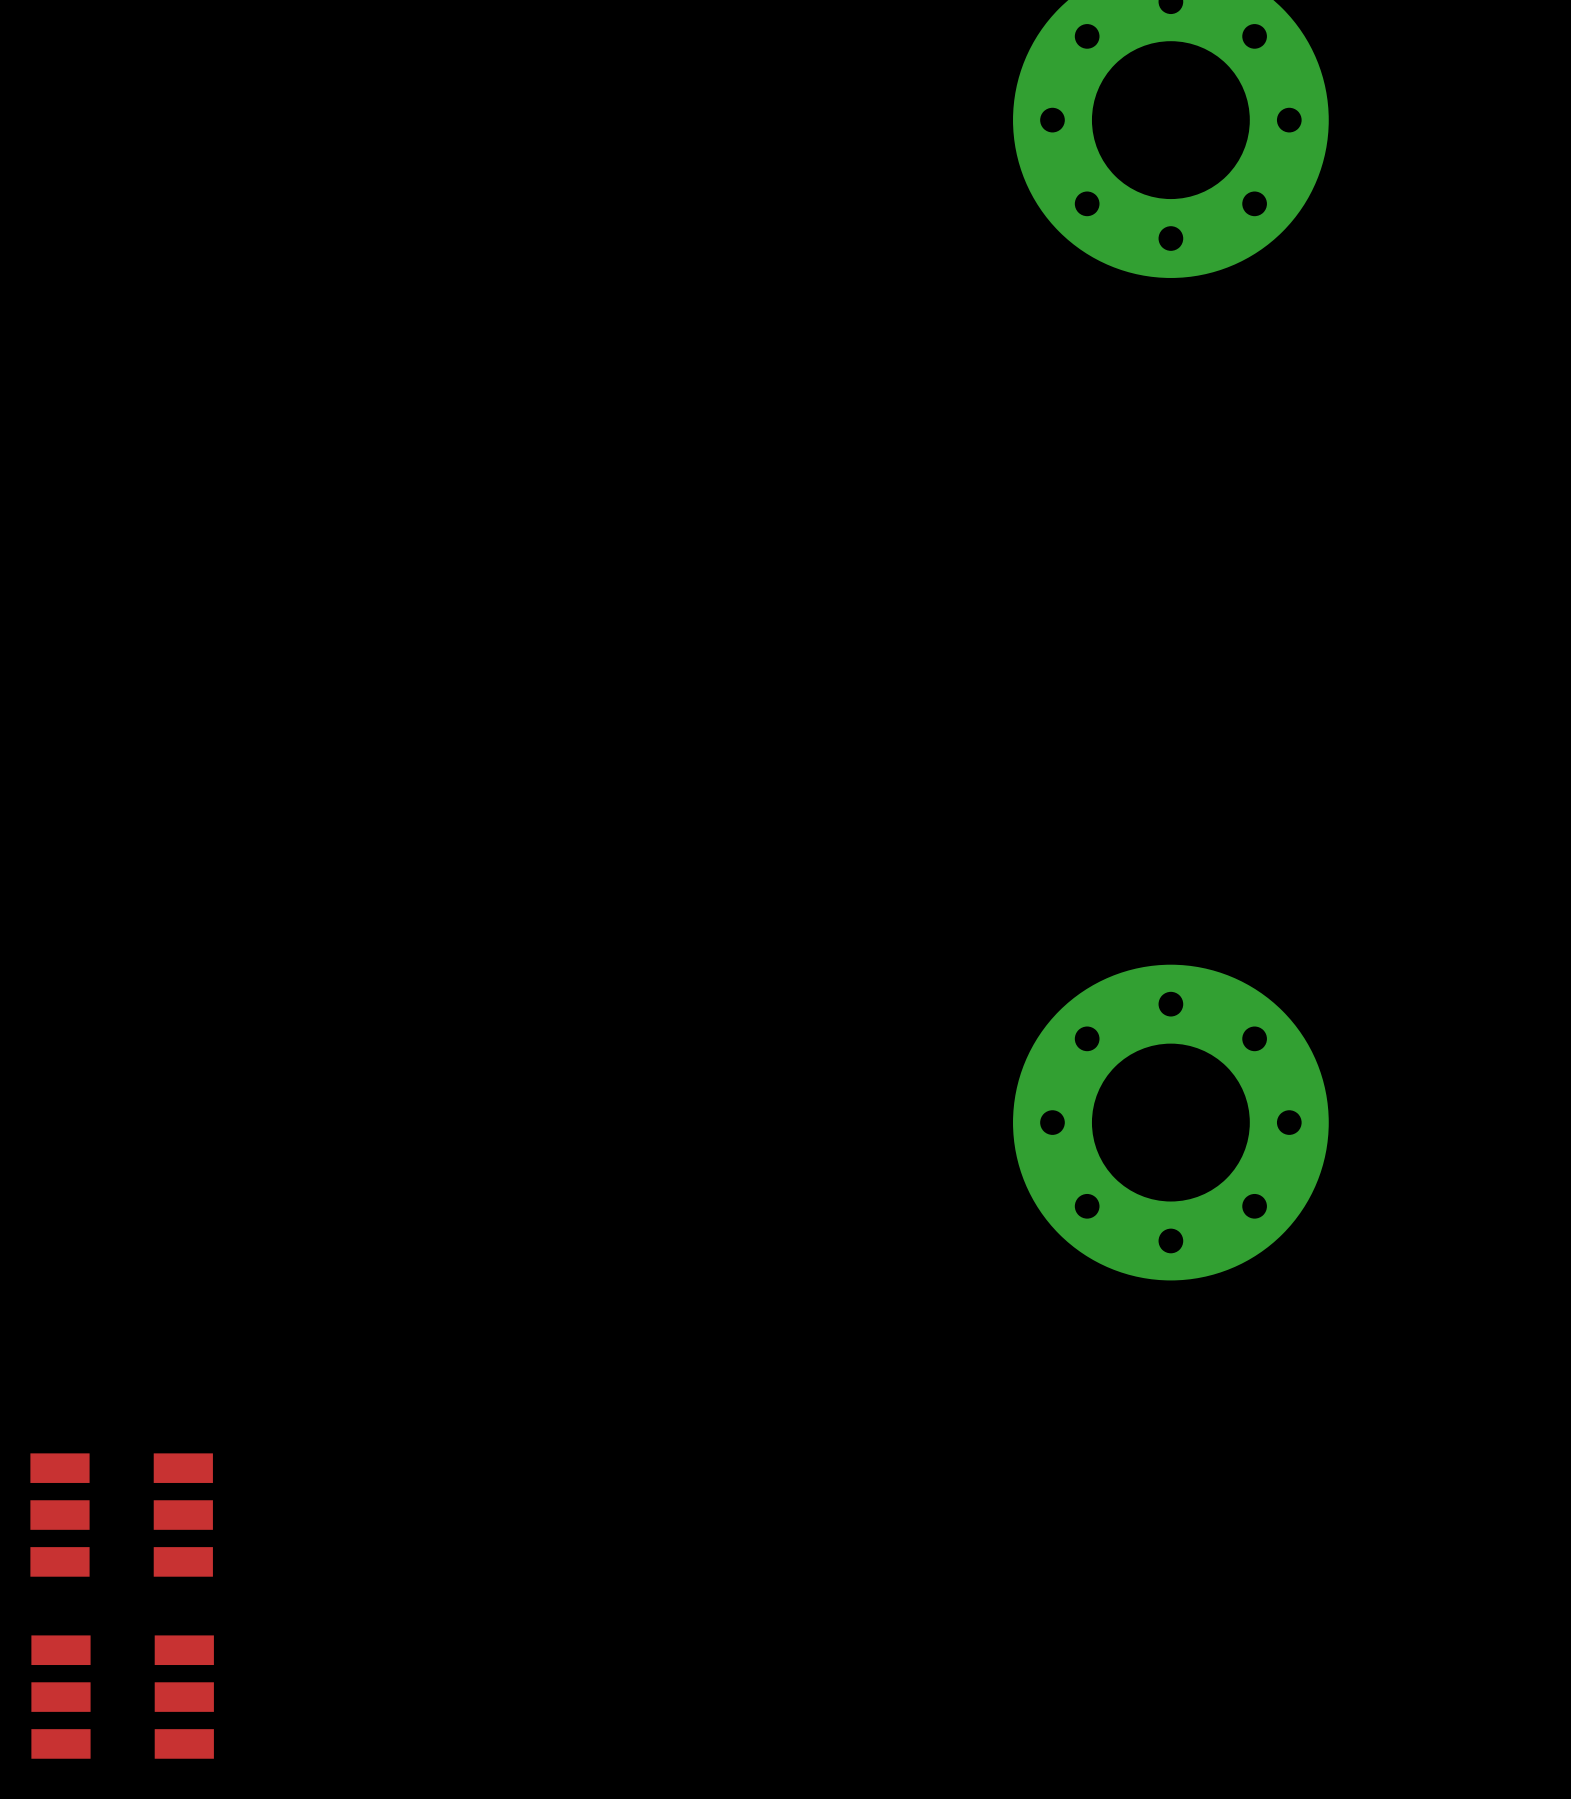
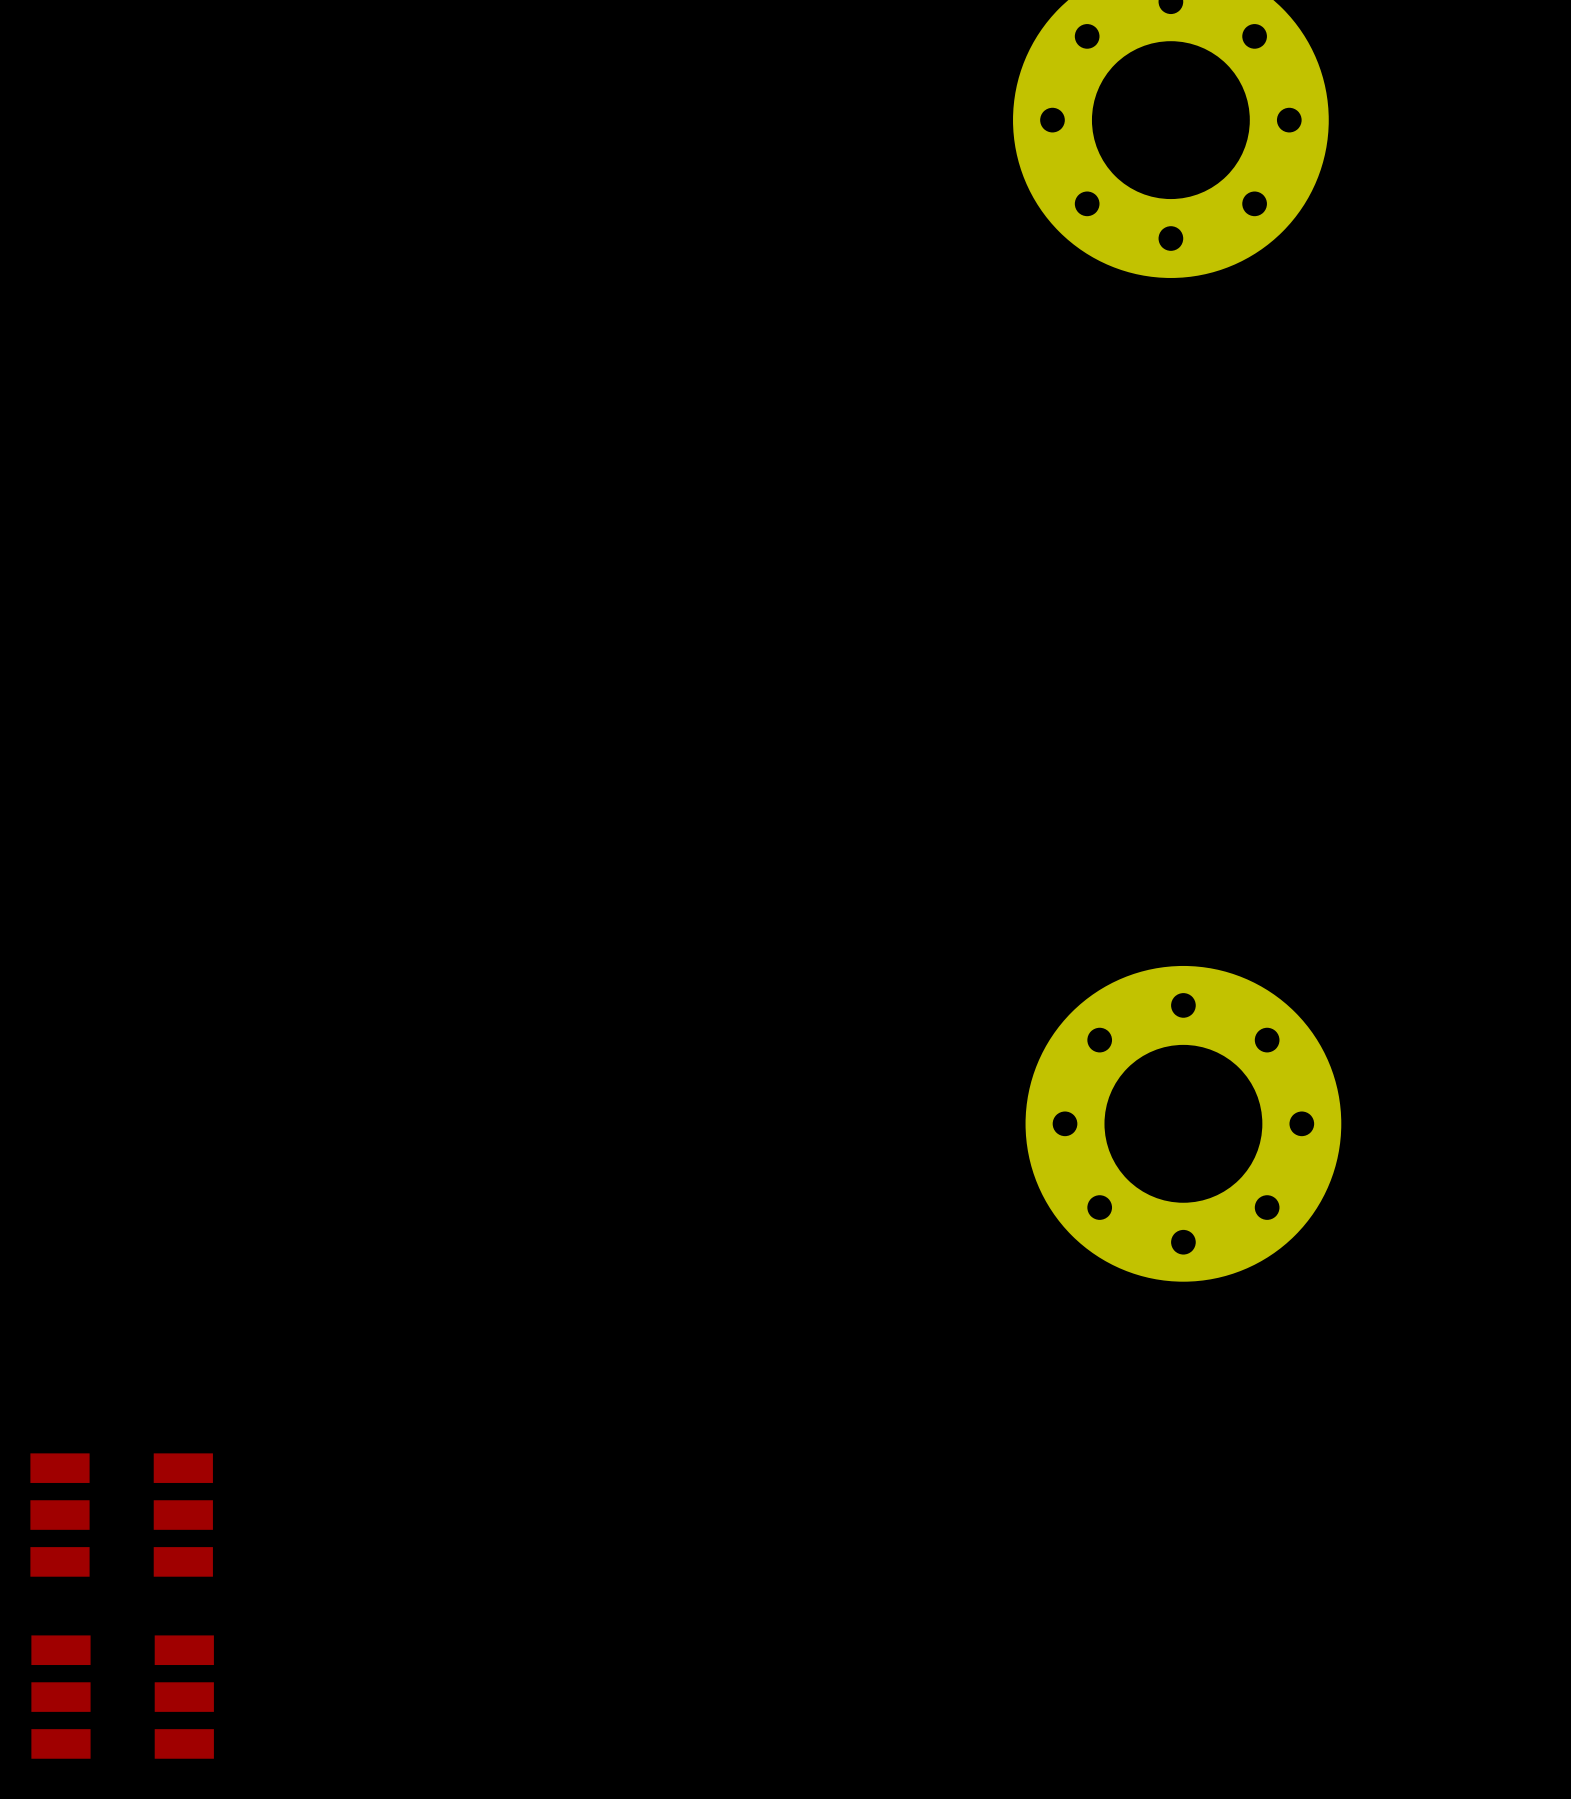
part position: (1170, 1122) -> (1183, 1123)

